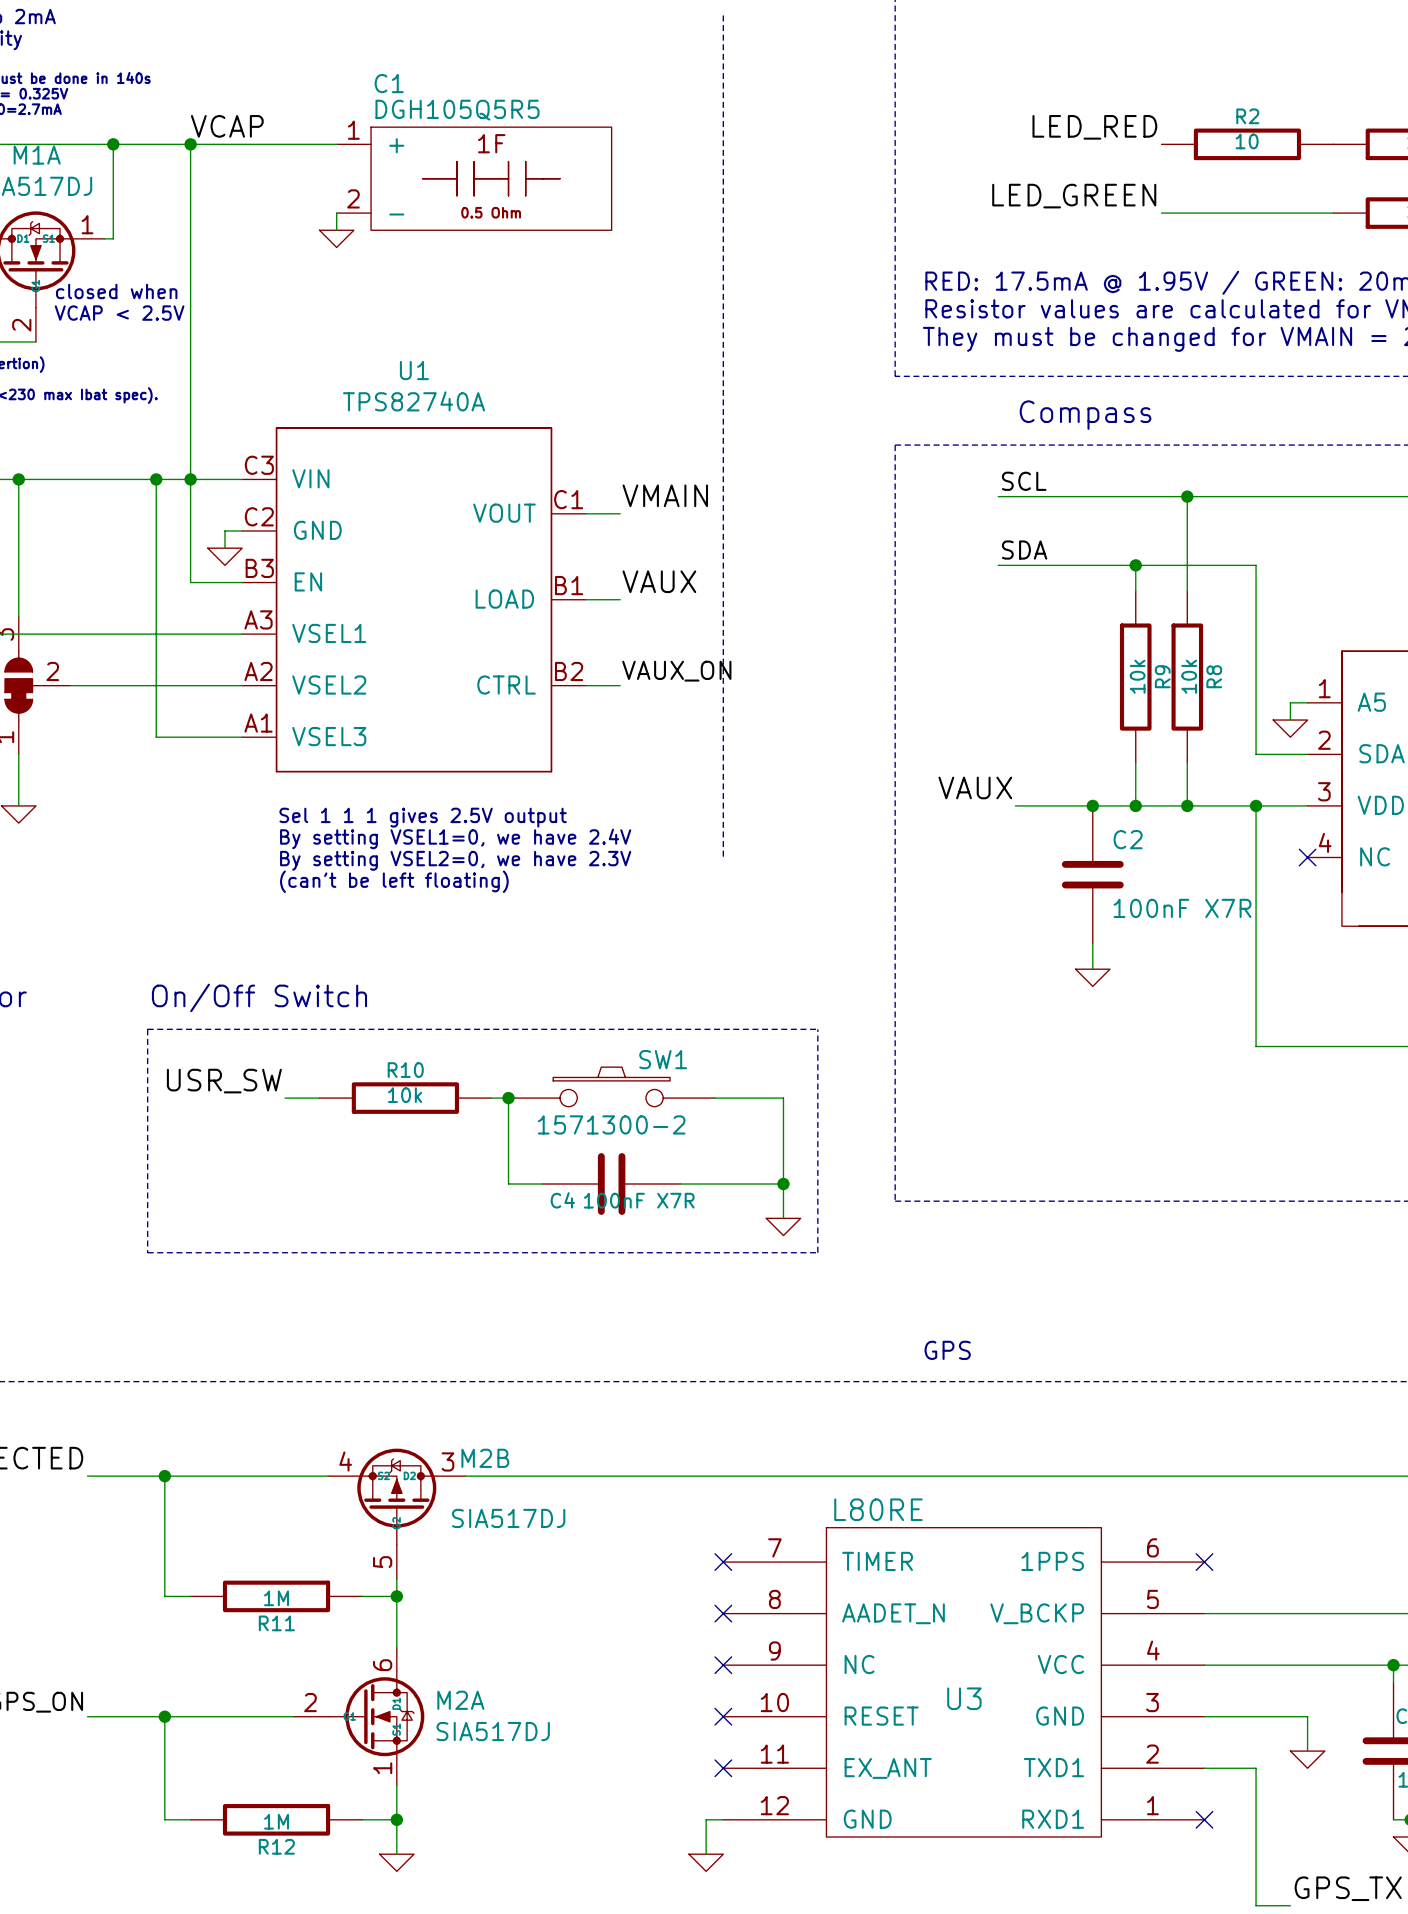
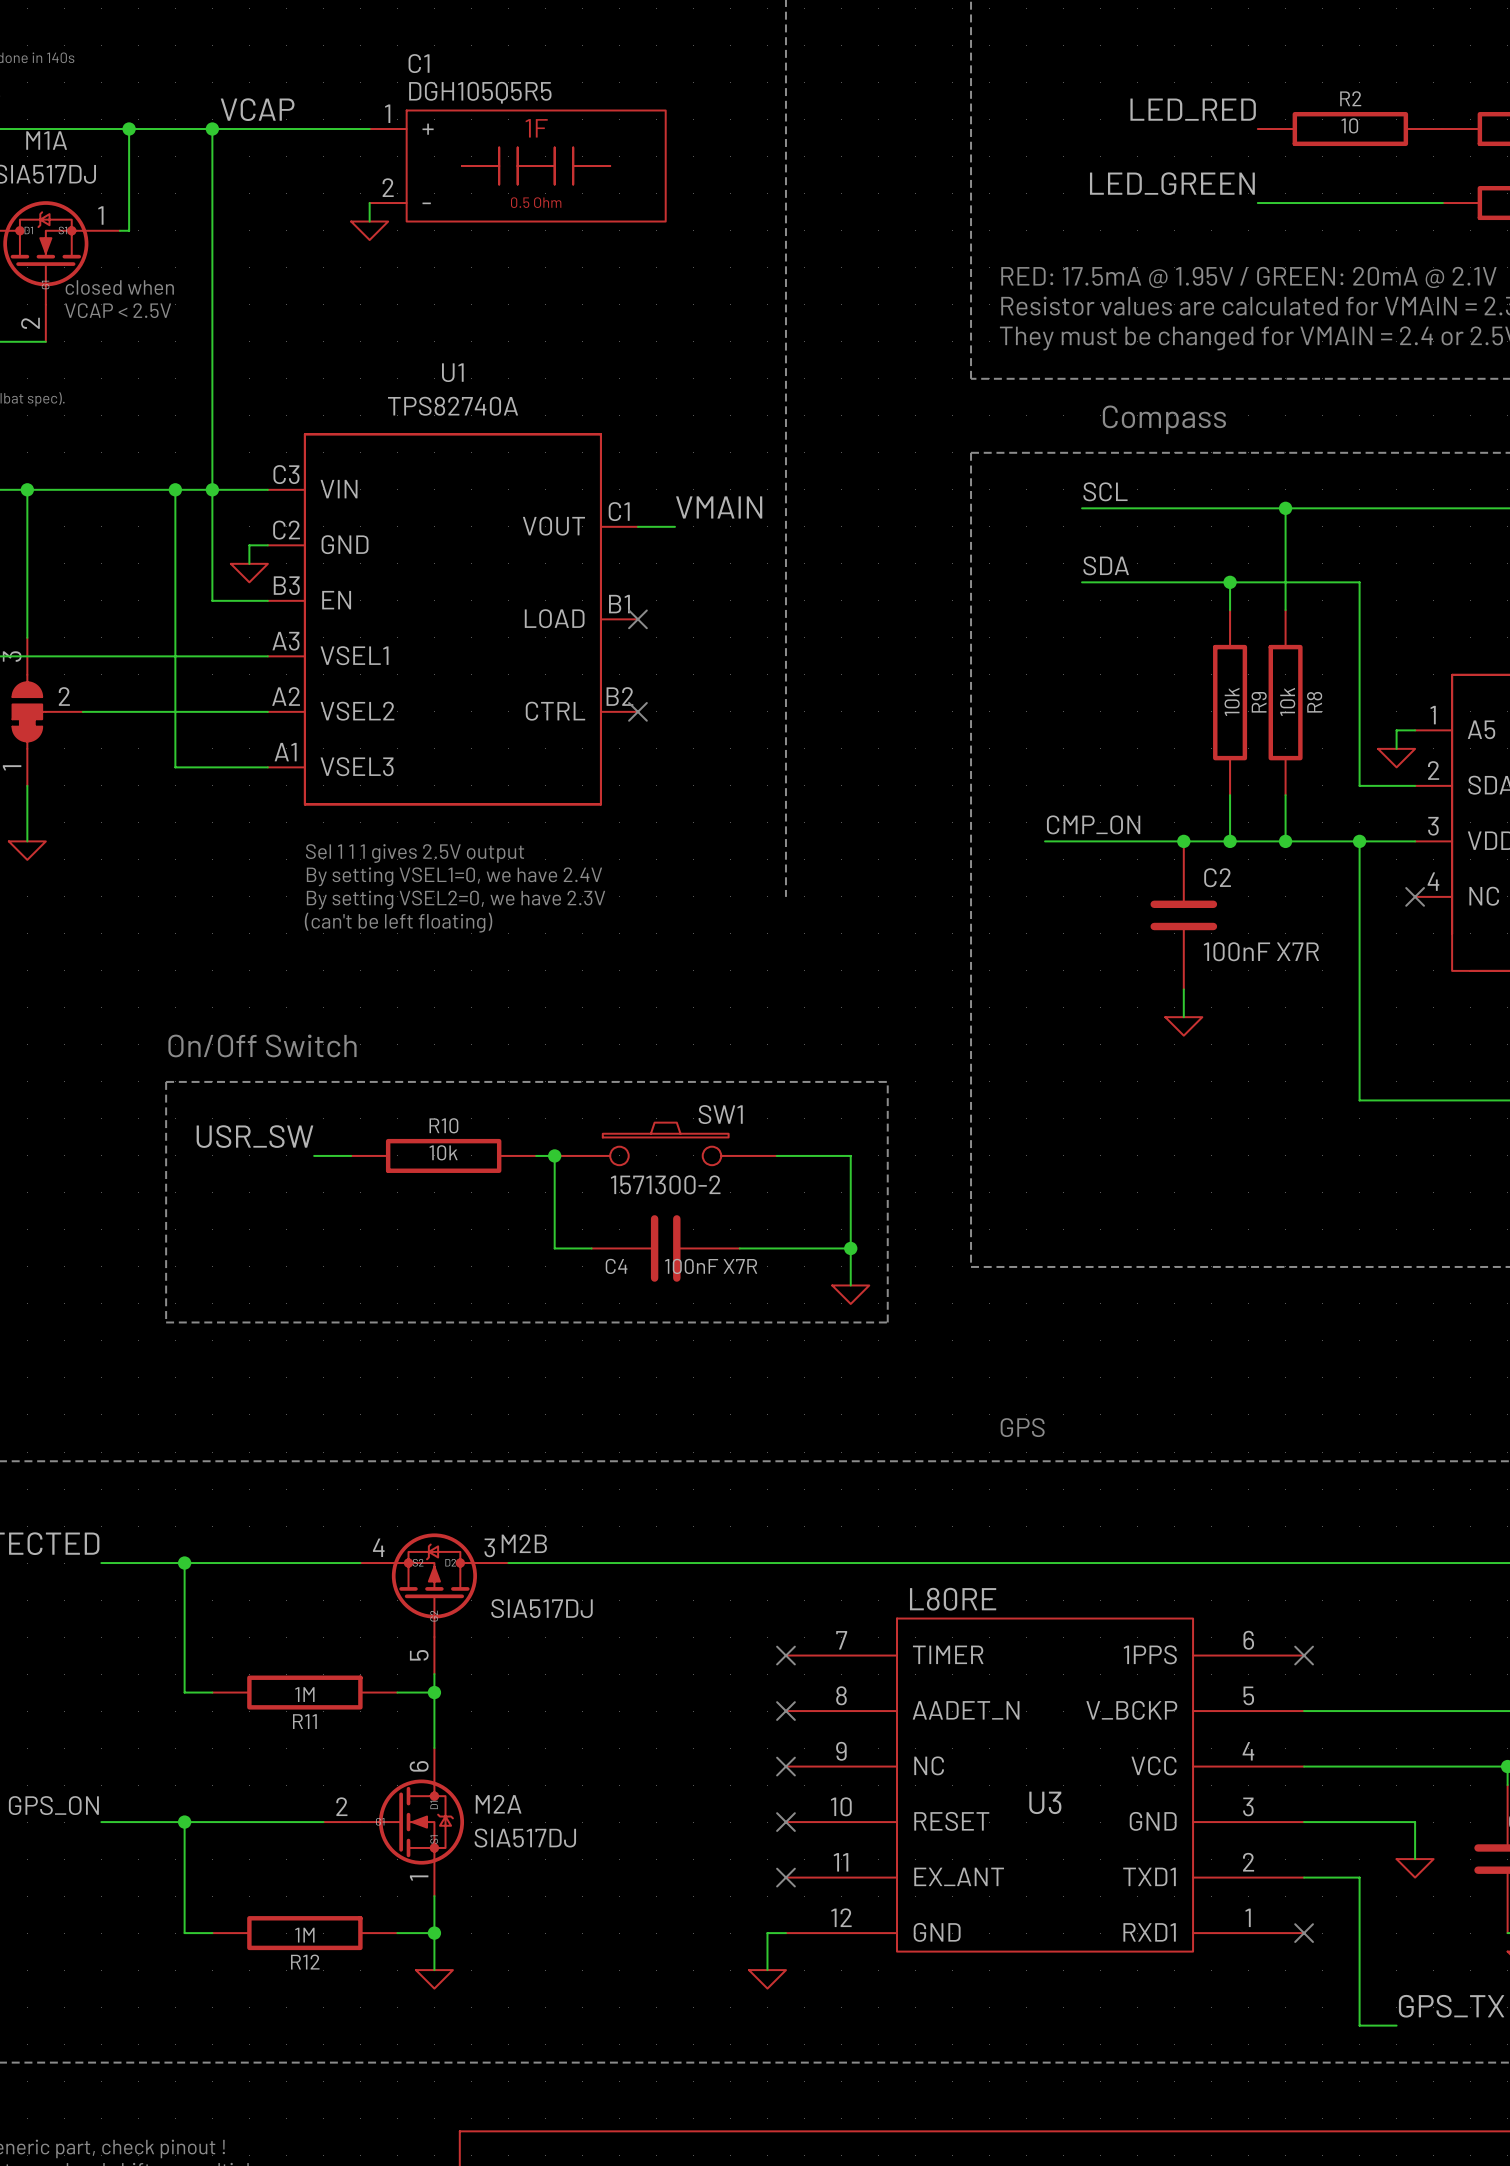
label: VAUX (659, 581) -> none
wire: (585, 599) (620, 599) -> none
no-connect mark: none -> (637, 619)
label: VAUX_ON (676, 671) -> none
wire: (585, 685) (620, 685) -> none
no-connect mark: none -> (637, 711)
label: VAUX (975, 787) -> none
label: none -> CMP_ON (1093, 824)
wire: none -> (1045, 841) (1100, 841)

